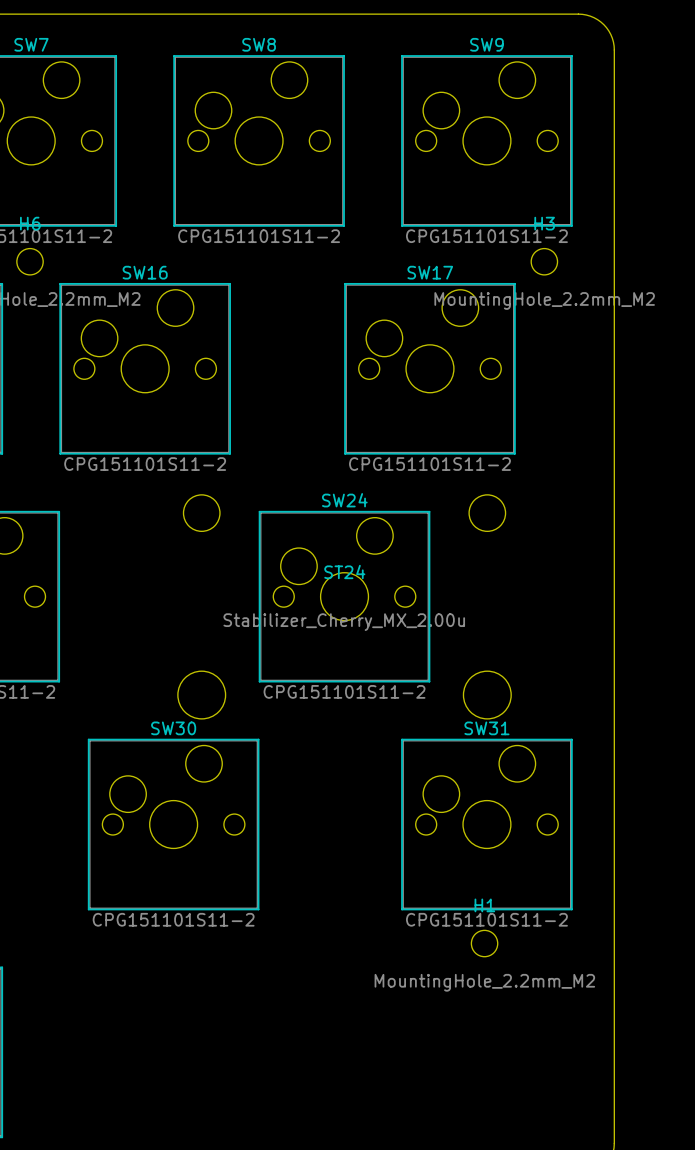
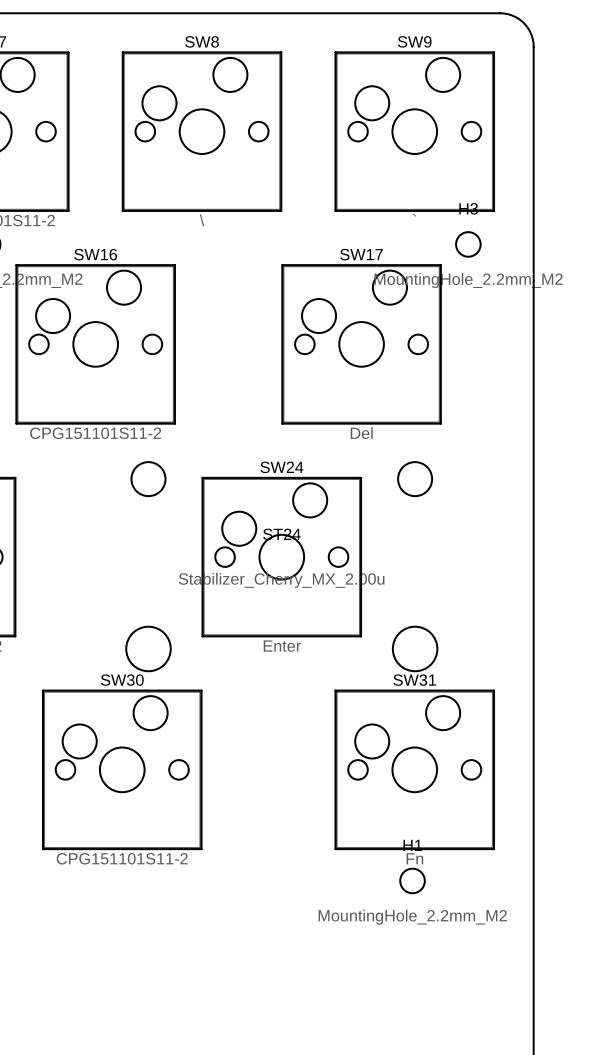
SW8 value: CPG151101S11-2 (259, 236) -> \ (202, 220)
SW9 value: CPG151101S11-2 (486, 236) -> ` (414, 215)
SW17 value: CPG151101S11-2 (429, 464) -> Del (361, 433)
SW24 value: CPG151101S11-2 (344, 691) -> Enter (282, 646)
SW31 value: CPG151101S11-2 (486, 919) -> Fn (414, 858)

